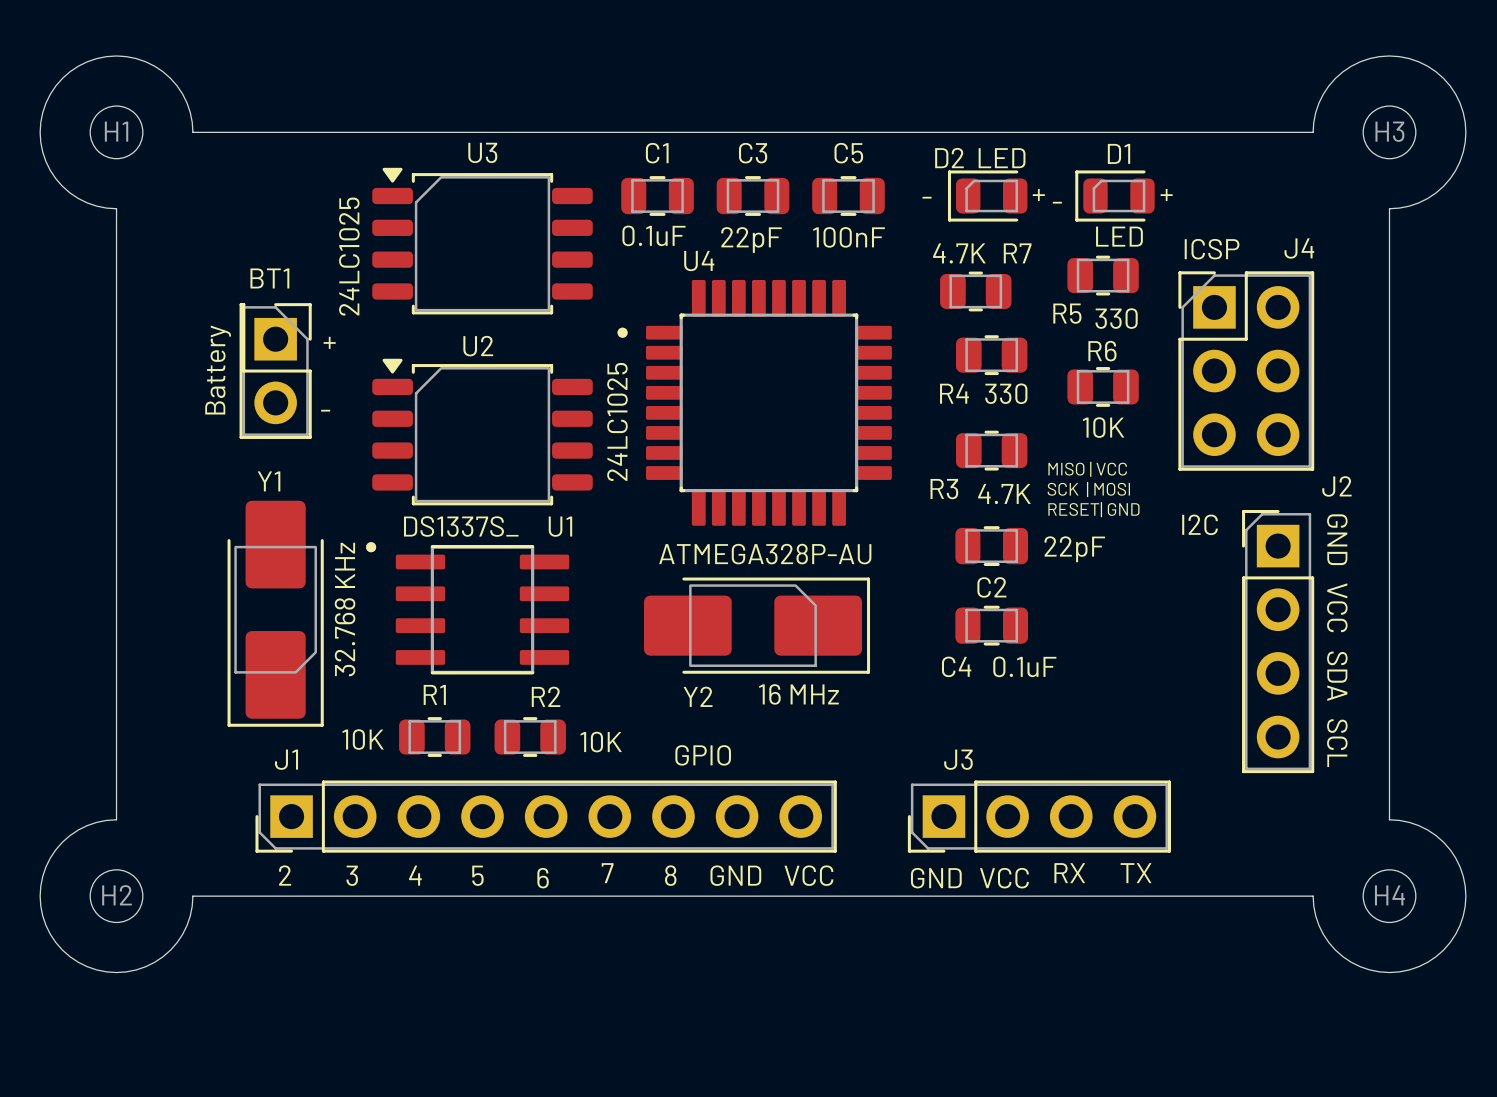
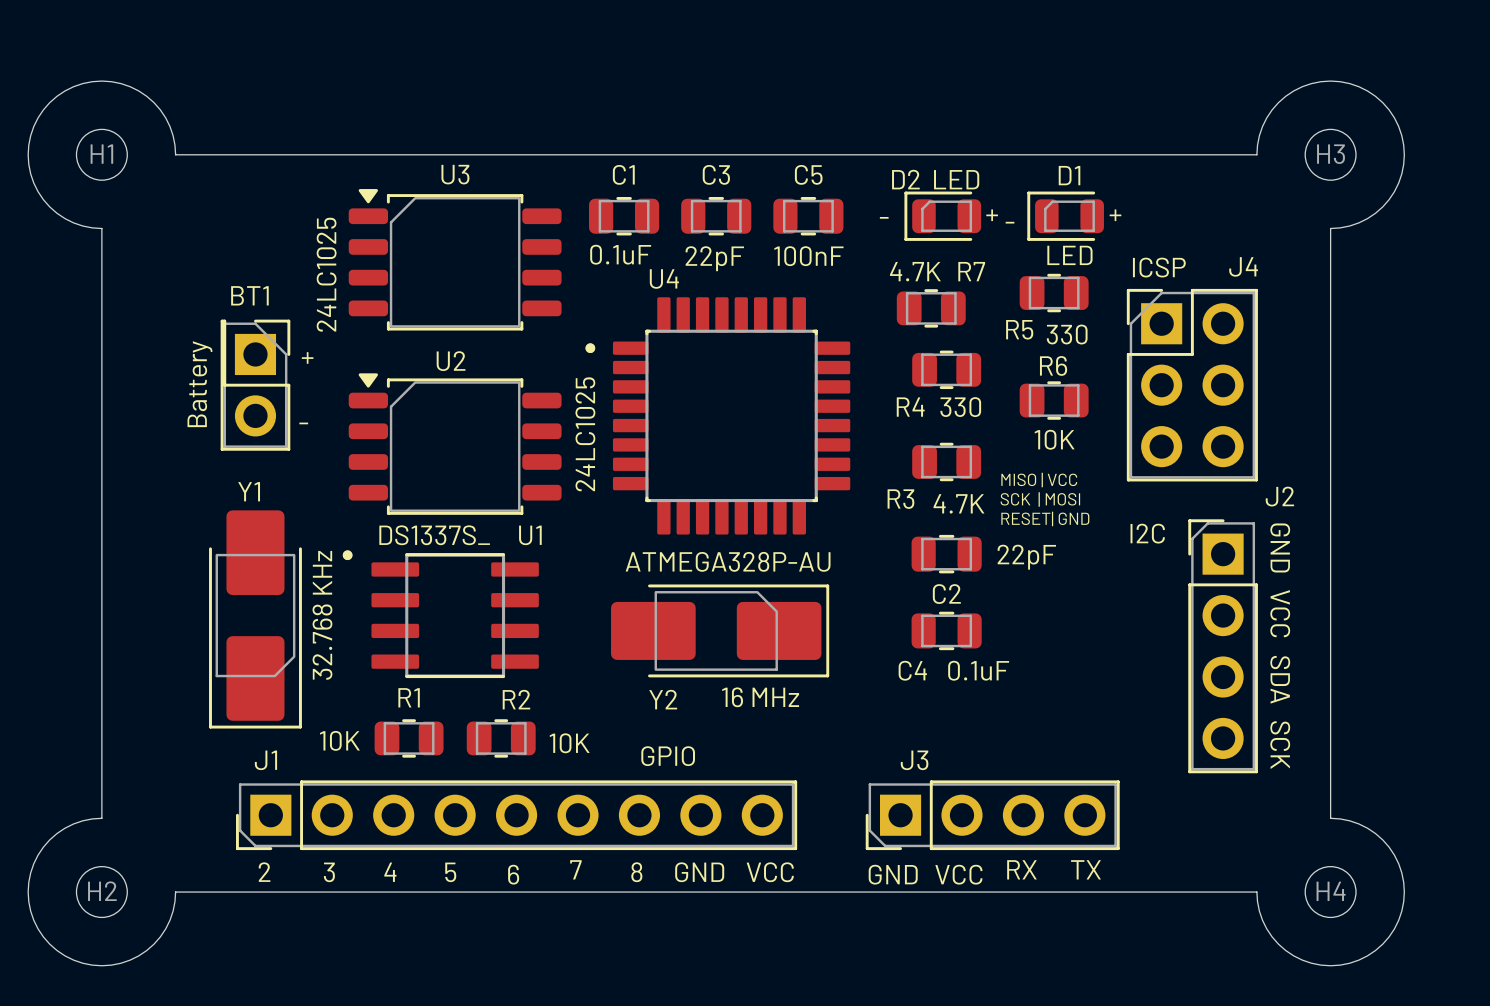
text: SCL (1337, 743) -> SCK (1280, 745)

